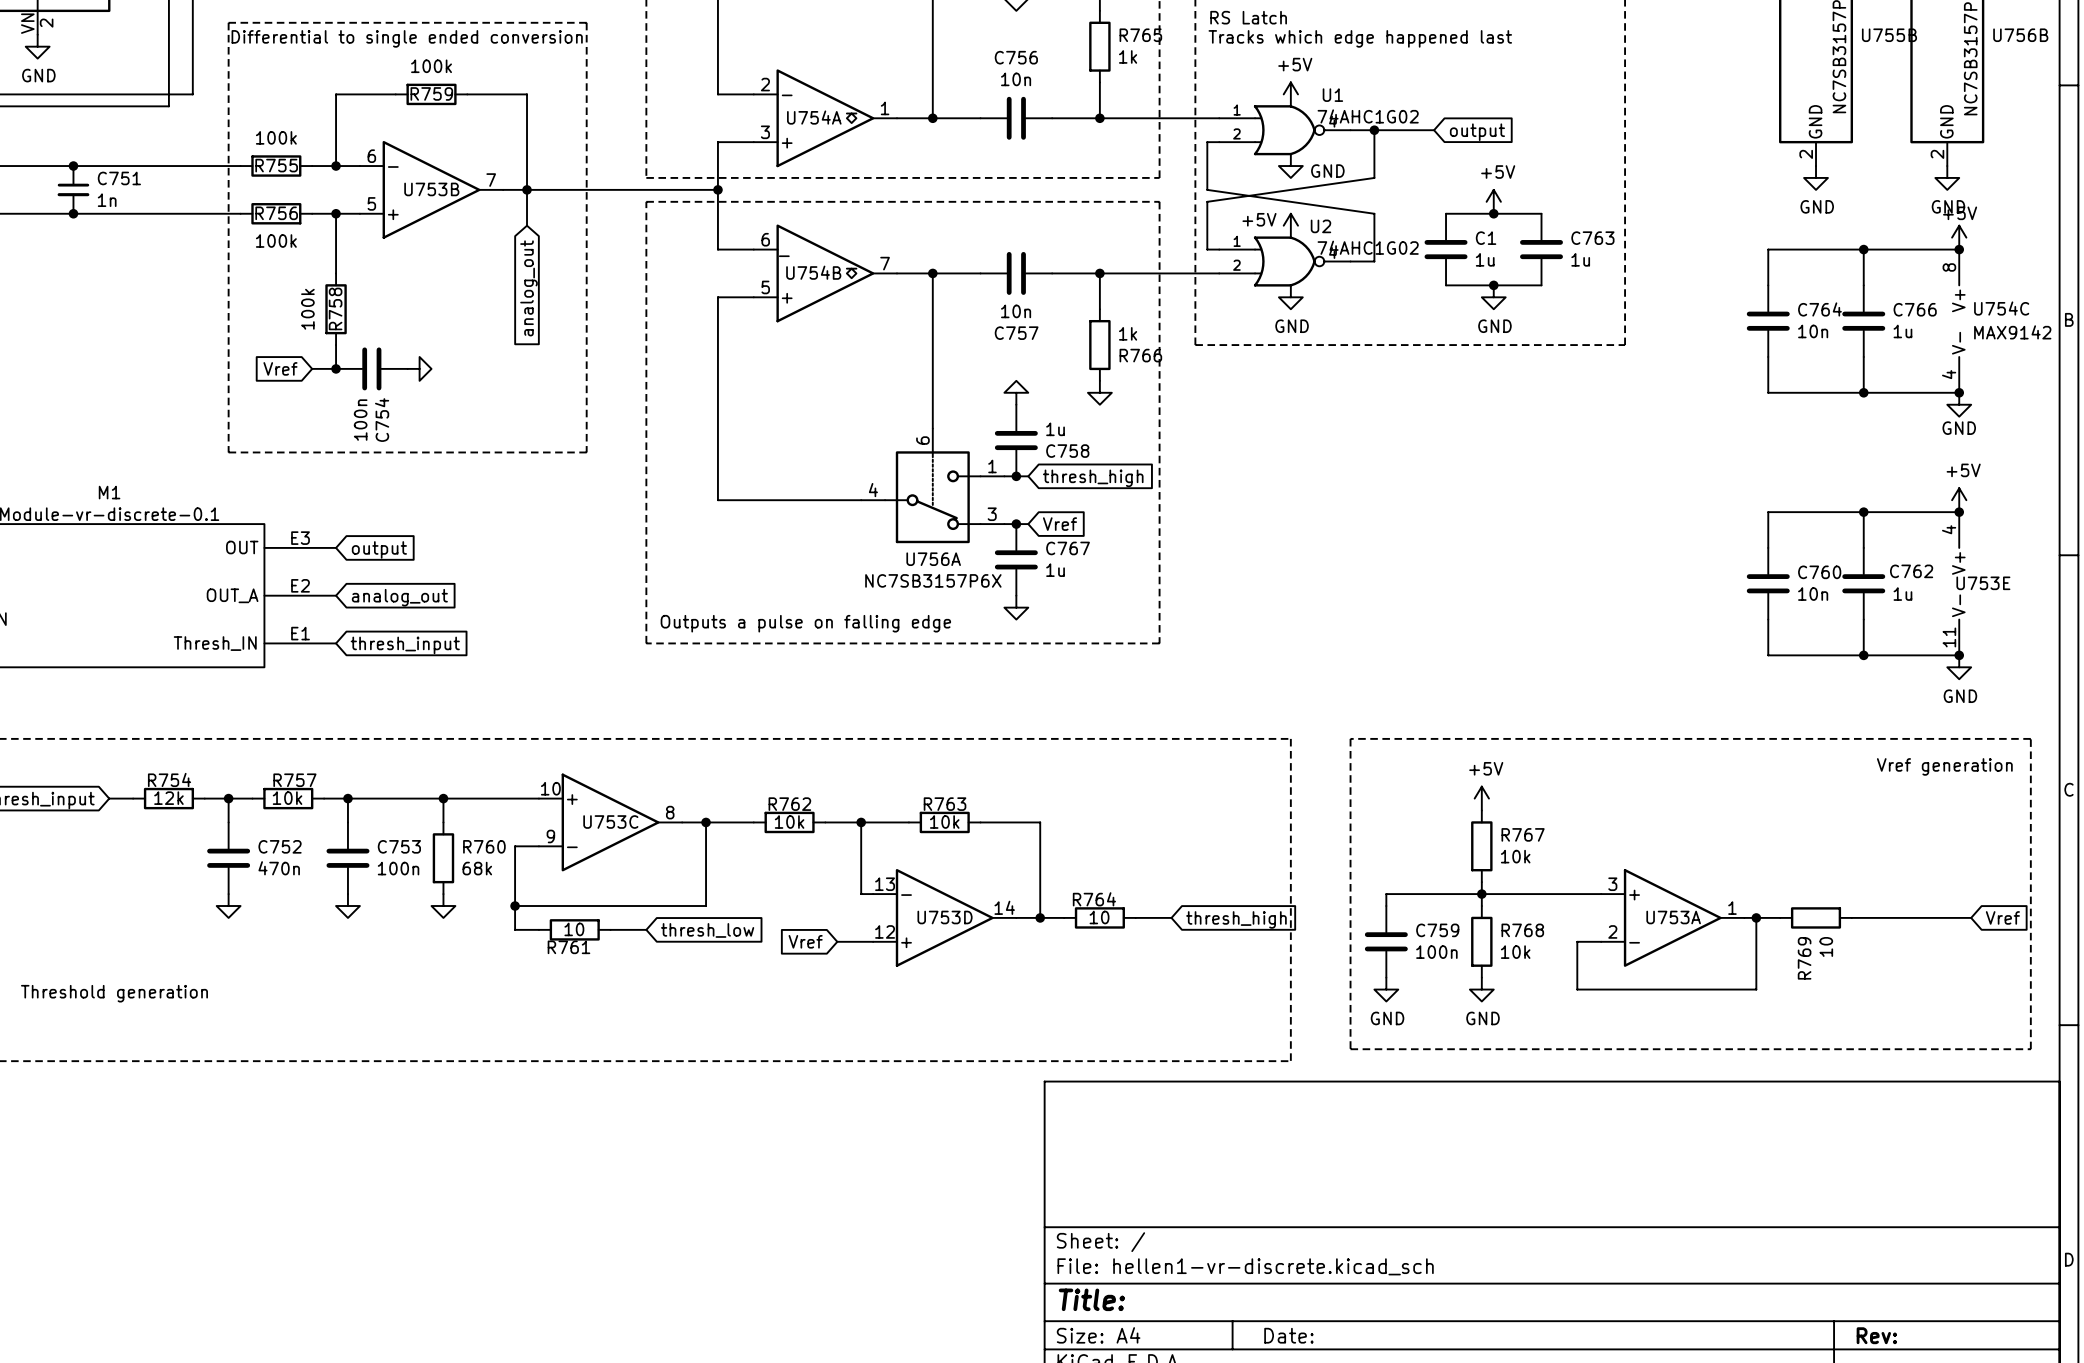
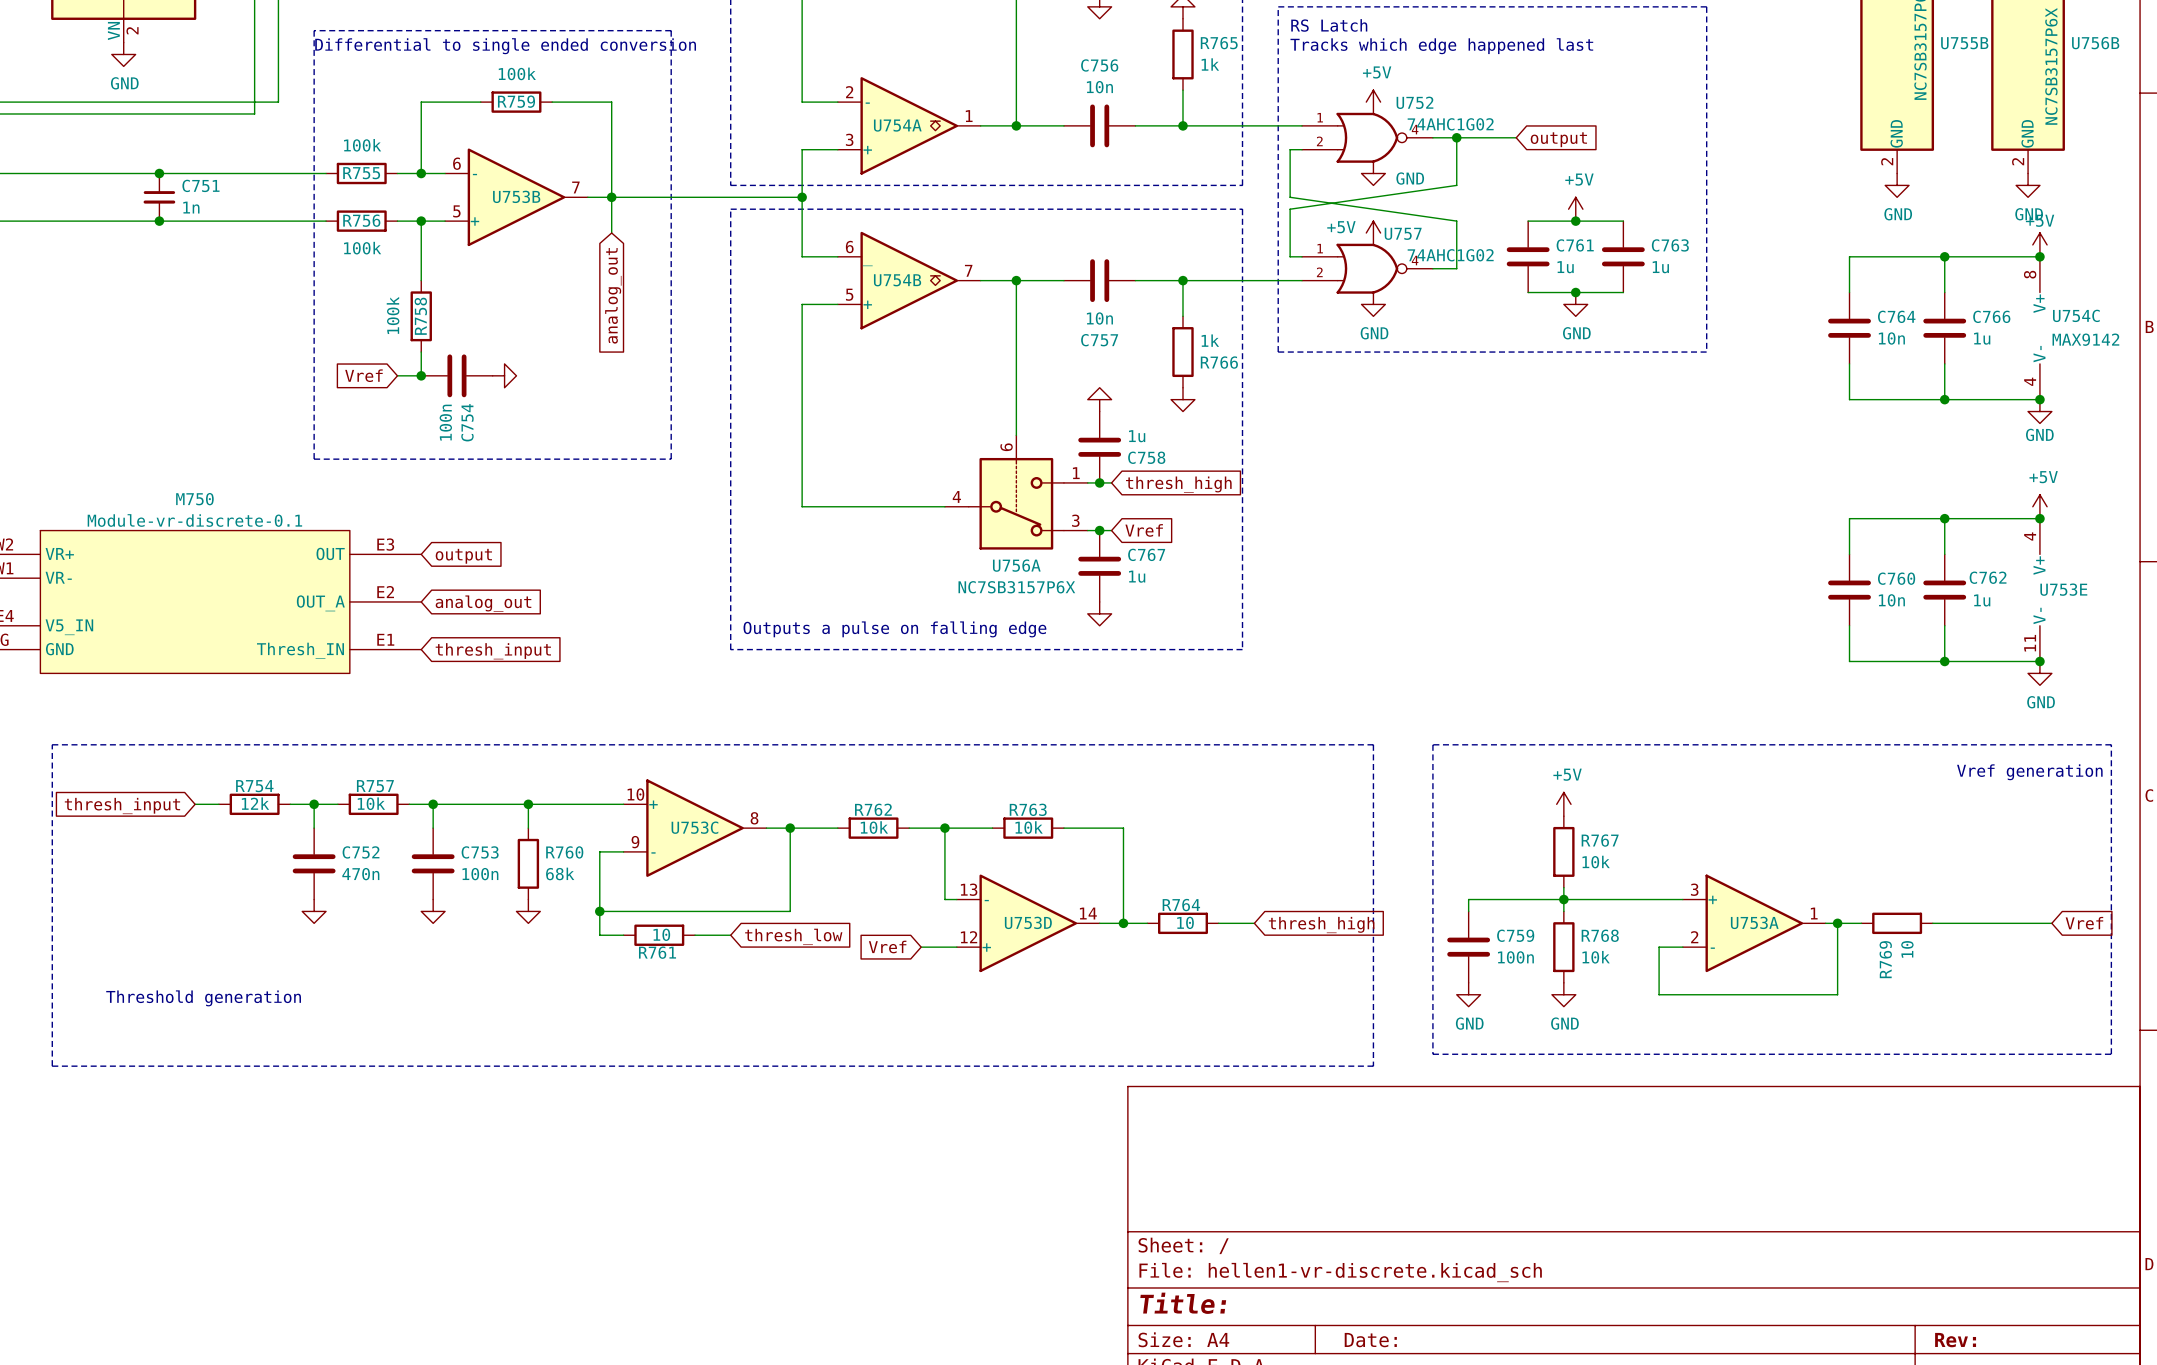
U1 name: U1 (1332, 95) -> U752 (1414, 102)
U2 name: U2 (1320, 226) -> U757 (1403, 233)
C1 name: C1 (1486, 238) -> C761 (1575, 245)
M1 name: M1 (109, 492) -> M750 (194, 499)

